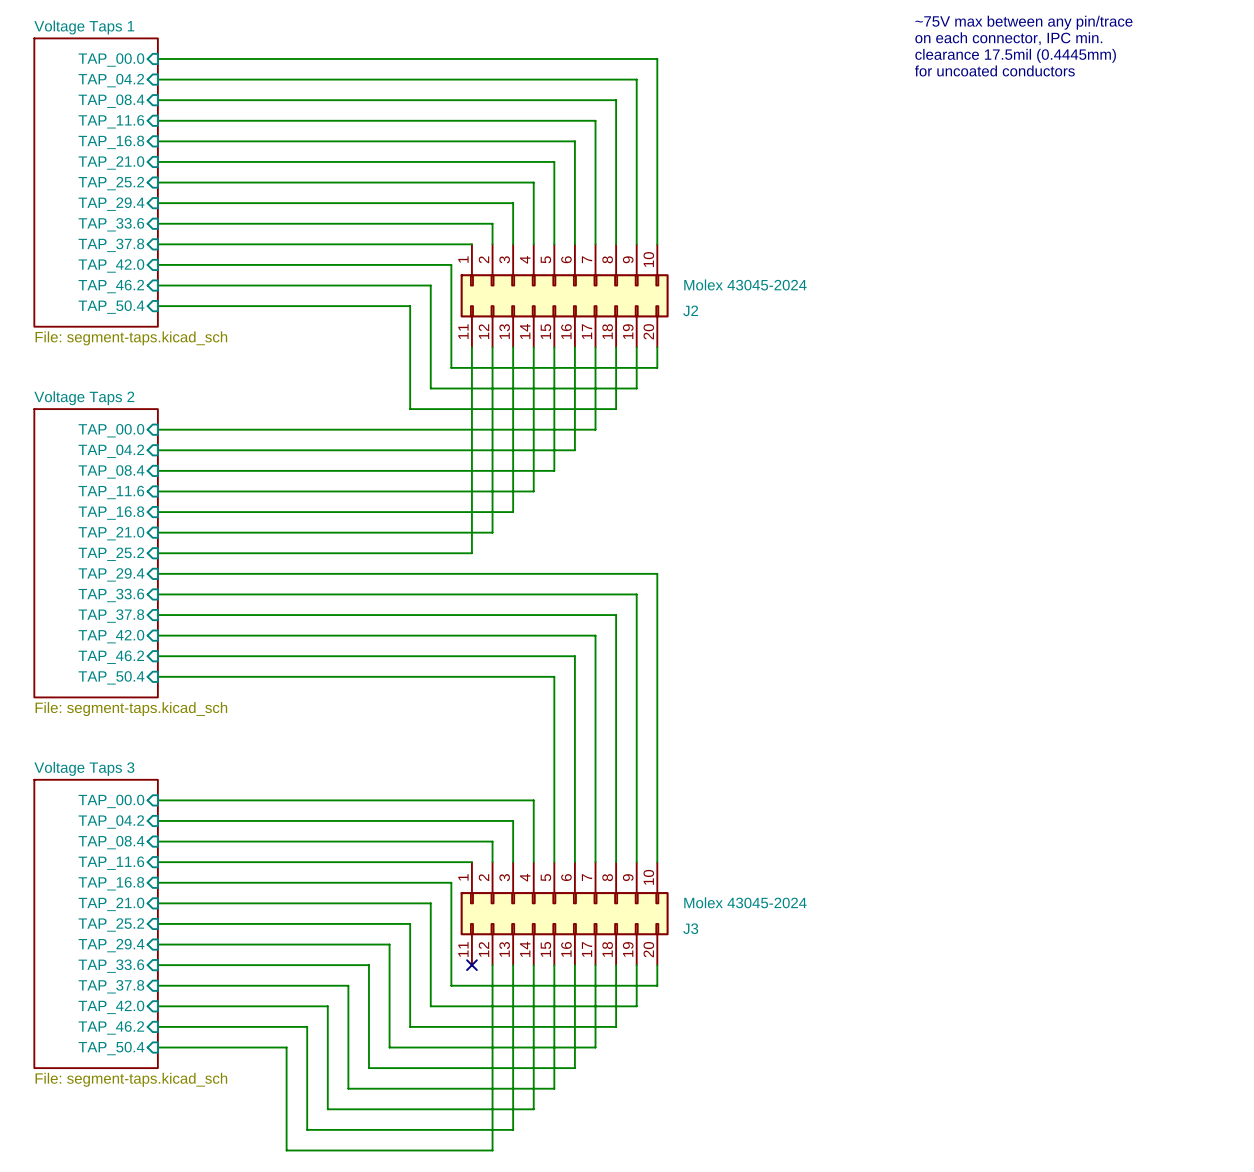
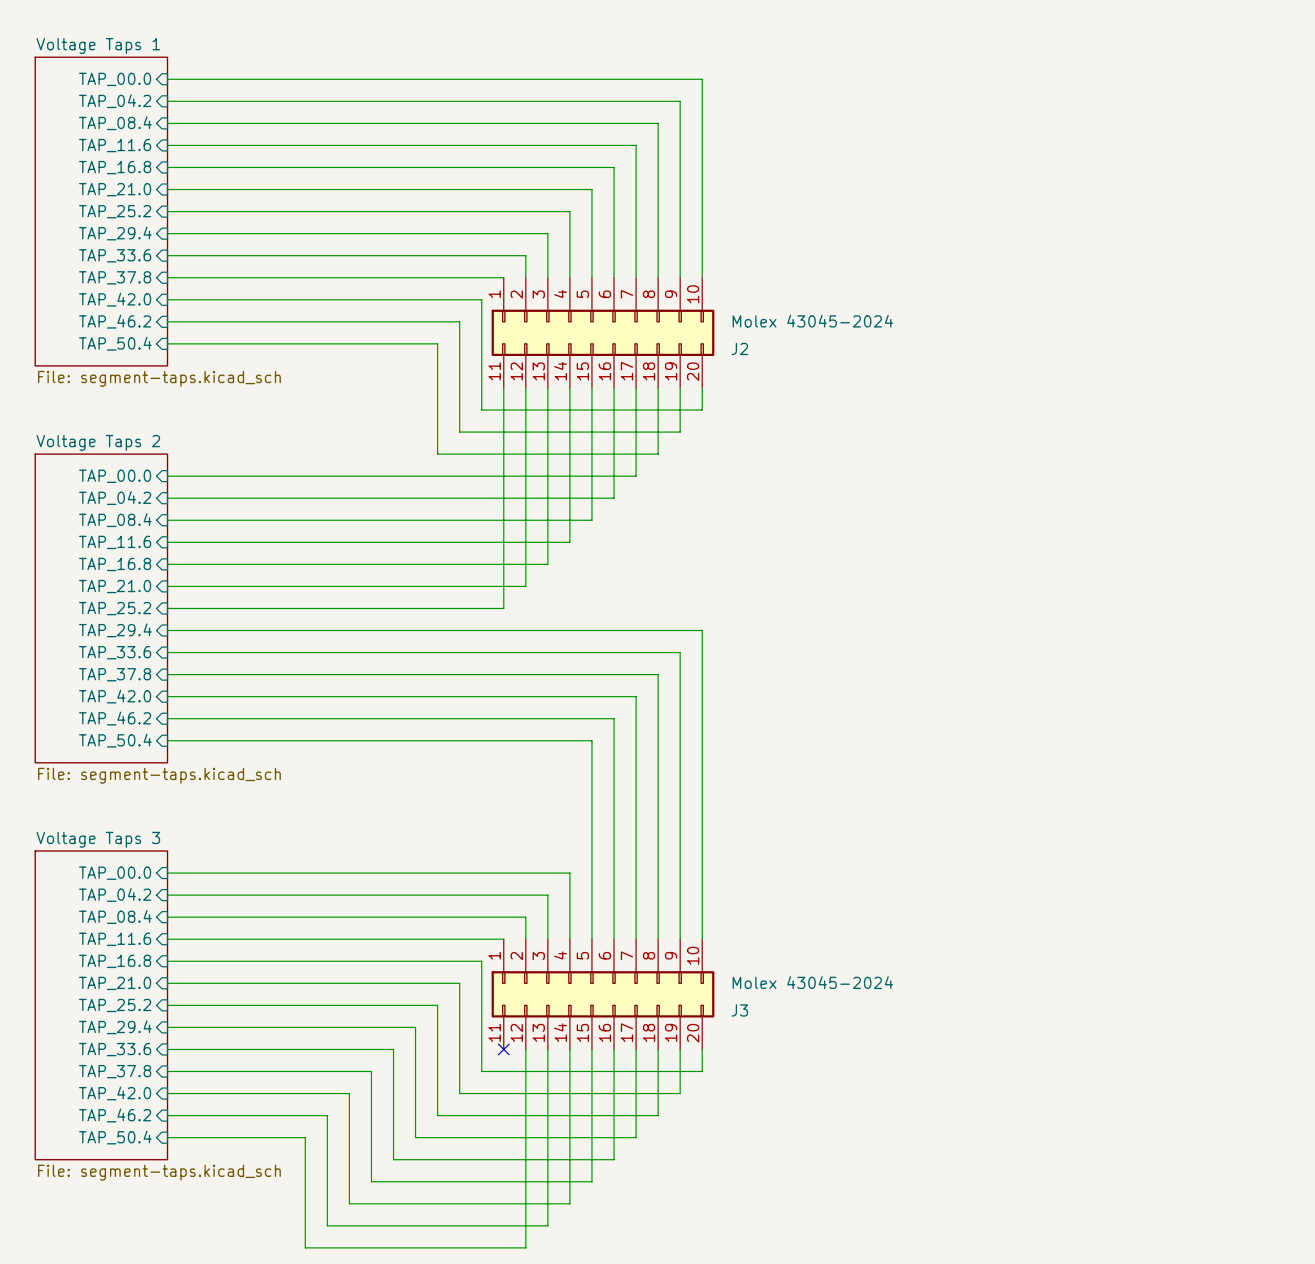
text: ~75V max between any pin/trace (1023, 22) -> none
text: on each connector, IPC min. (1008, 38) -> none
text: clearance 17.5mil (0.4445mm) (1015, 55) -> none
text: for uncoated conductors (994, 70) -> none

